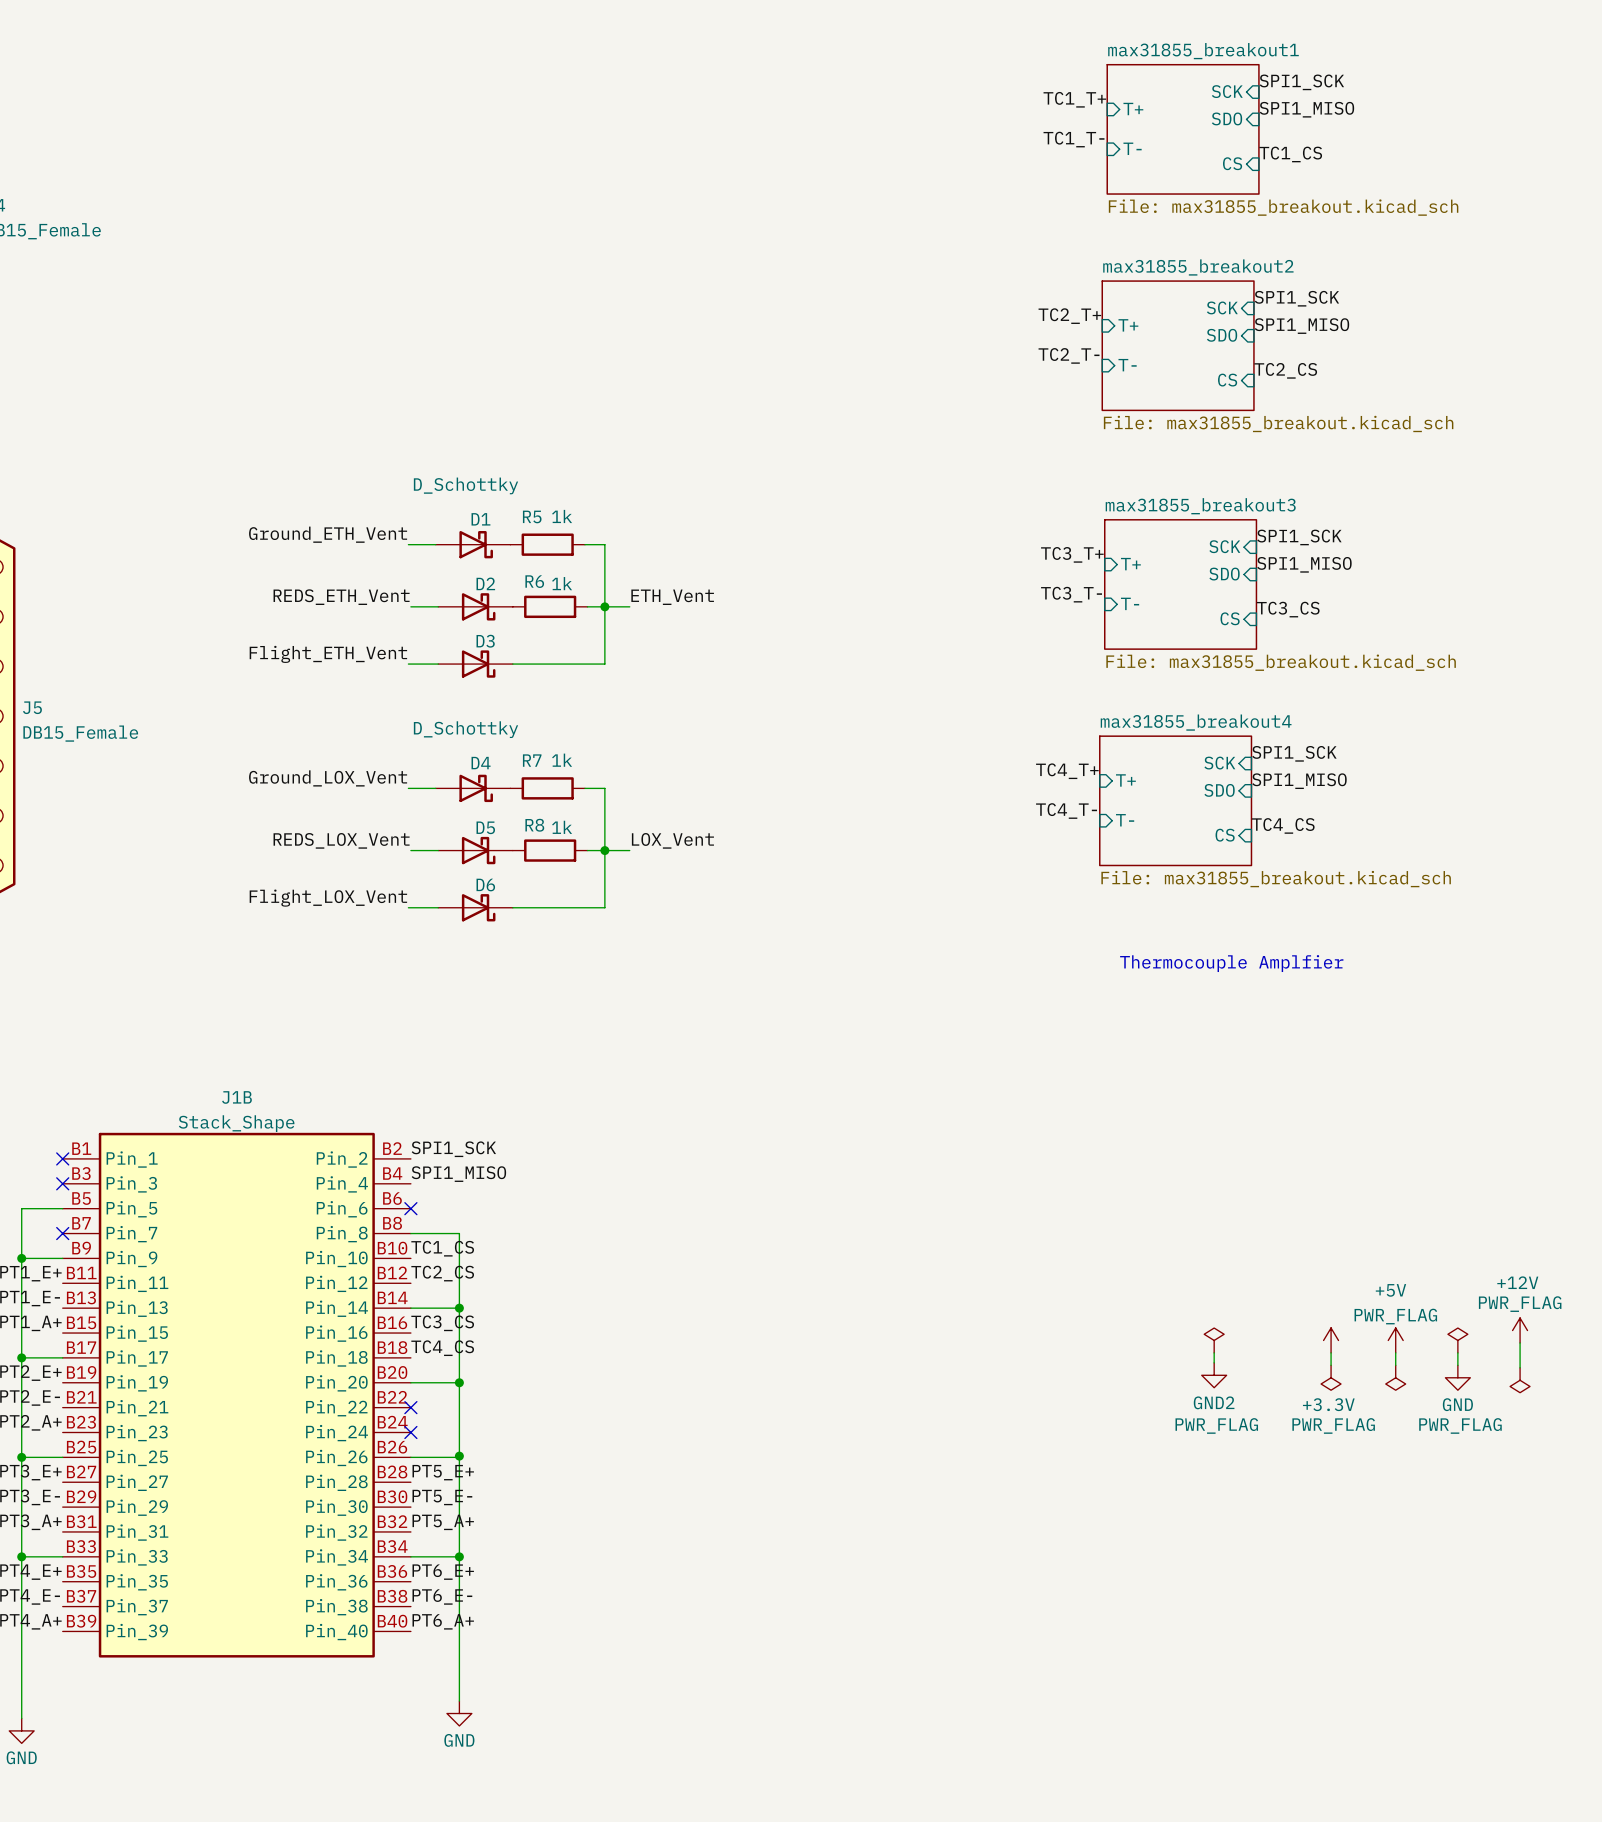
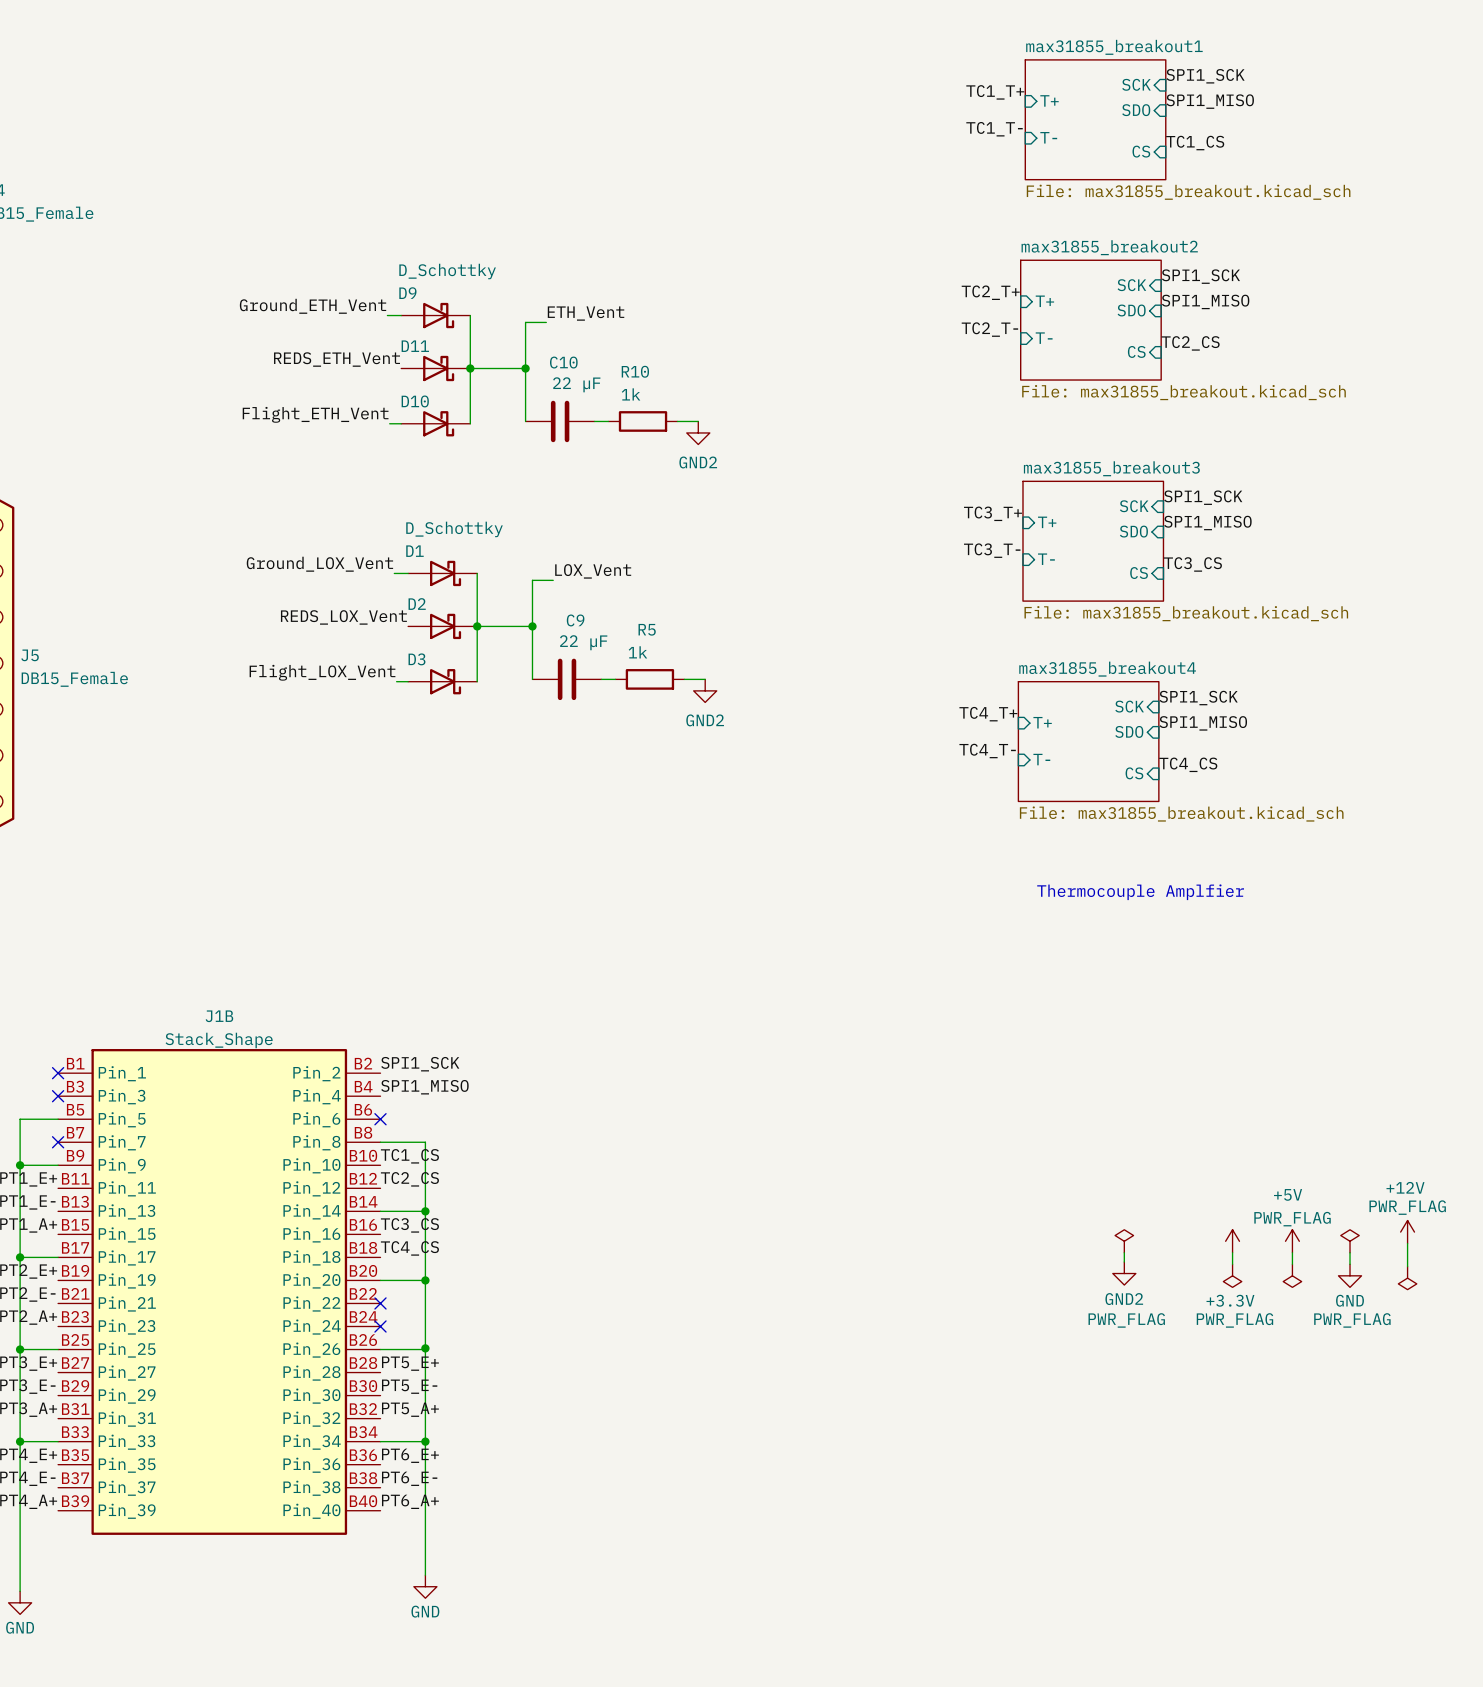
label: none -> ETH_Vent (586, 313)
wire: none -> (387, 315) (401, 315)
D9: none -> D_Schottky (435, 315)
wire: none -> (470, 315) (470, 423)
wire: none -> (546, 322) (525, 322) (525, 421)
D11: none -> (435, 368)
wire: none -> (470, 368) (525, 368)
junction: none -> (470, 368)
junction: none -> (525, 368)
C10: none -> 22 µF (560, 421)
wire: none -> (594, 421) (608, 421)
R10: none -> 1k (643, 421)
wire: none -> (677, 421) (698, 421)
wire: none -> (389, 423) (401, 423)
D10: none -> (435, 423)
power symbol: none -> GND2 (698, 432)
D1 value position: D_Schottky (465, 485) -> D_Schottky (454, 529)
R5 name position: R5 (532, 516) -> R5 (647, 629)
R5 value position: 1k (562, 516) -> 1k (637, 652)
D1 name position: D1 (480, 519) -> D1 (414, 551)
label position: Ground_ETH_Vent (328, 534) -> Ground_ETH_Vent (313, 306)
wire: (408, 544) (435, 544) -> none
D1 position: (473, 544) -> (442, 573)
R5 position: (547, 544) -> (649, 679)
wire: (584, 544) (604, 544) (604, 664) (512, 664) -> none
D2 name position: D2 (485, 583) -> D2 (417, 604)
label position: REDS_ETH_Vent (341, 597) -> REDS_ETH_Vent (337, 359)
label: ETH_Vent (672, 597) -> none
wire: (410, 606) (438, 606) -> none
D2 position: (475, 606) -> (442, 626)
R6: 1k (550, 606) -> none
wire: (587, 606) (629, 606) -> none
junction: (604, 606) -> none
wire: none -> (394, 573) (408, 573)
wire: none -> (477, 573) (477, 681)
wire: none -> (553, 580) (532, 580) (532, 679)
D3 name position: D3 (485, 641) -> D3 (416, 659)
label position: Flight_ETH_Vent (328, 654) -> Flight_ETH_Vent (315, 414)
wire: (408, 664) (438, 664) -> none
D3 position: (475, 664) -> (442, 681)
wire: none -> (477, 626) (532, 626)
junction: none -> (477, 626)
junction: none -> (532, 626)
C9: none -> 22 µF (567, 679)
wire: none -> (601, 679) (615, 679)
wire: none -> (684, 679) (705, 679)
wire: none -> (396, 681) (408, 681)
power symbol: none -> GND2 (705, 690)
label position: Ground_LOX_Vent (328, 778) -> Ground_LOX_Vent (319, 564)
wire: (408, 788) (435, 788) -> none
D4: D_Schottky (473, 788) -> none
R7: 1k (547, 788) -> none
wire: (584, 788) (604, 788) (604, 907) (512, 907) -> none
label position: REDS_LOX_Vent (341, 840) -> REDS_LOX_Vent (343, 617)
label position: LOX_Vent (672, 840) -> LOX_Vent (593, 571)
wire: (410, 850) (438, 850) -> none
D5: (475, 850) -> none
R8: 1k (550, 850) -> none
wire: (587, 850) (629, 850) -> none
junction: (604, 850) -> none
label position: Flight_LOX_Vent (328, 898) -> Flight_LOX_Vent (322, 672)
wire: (408, 907) (438, 907) -> none
D6: (475, 907) -> none

